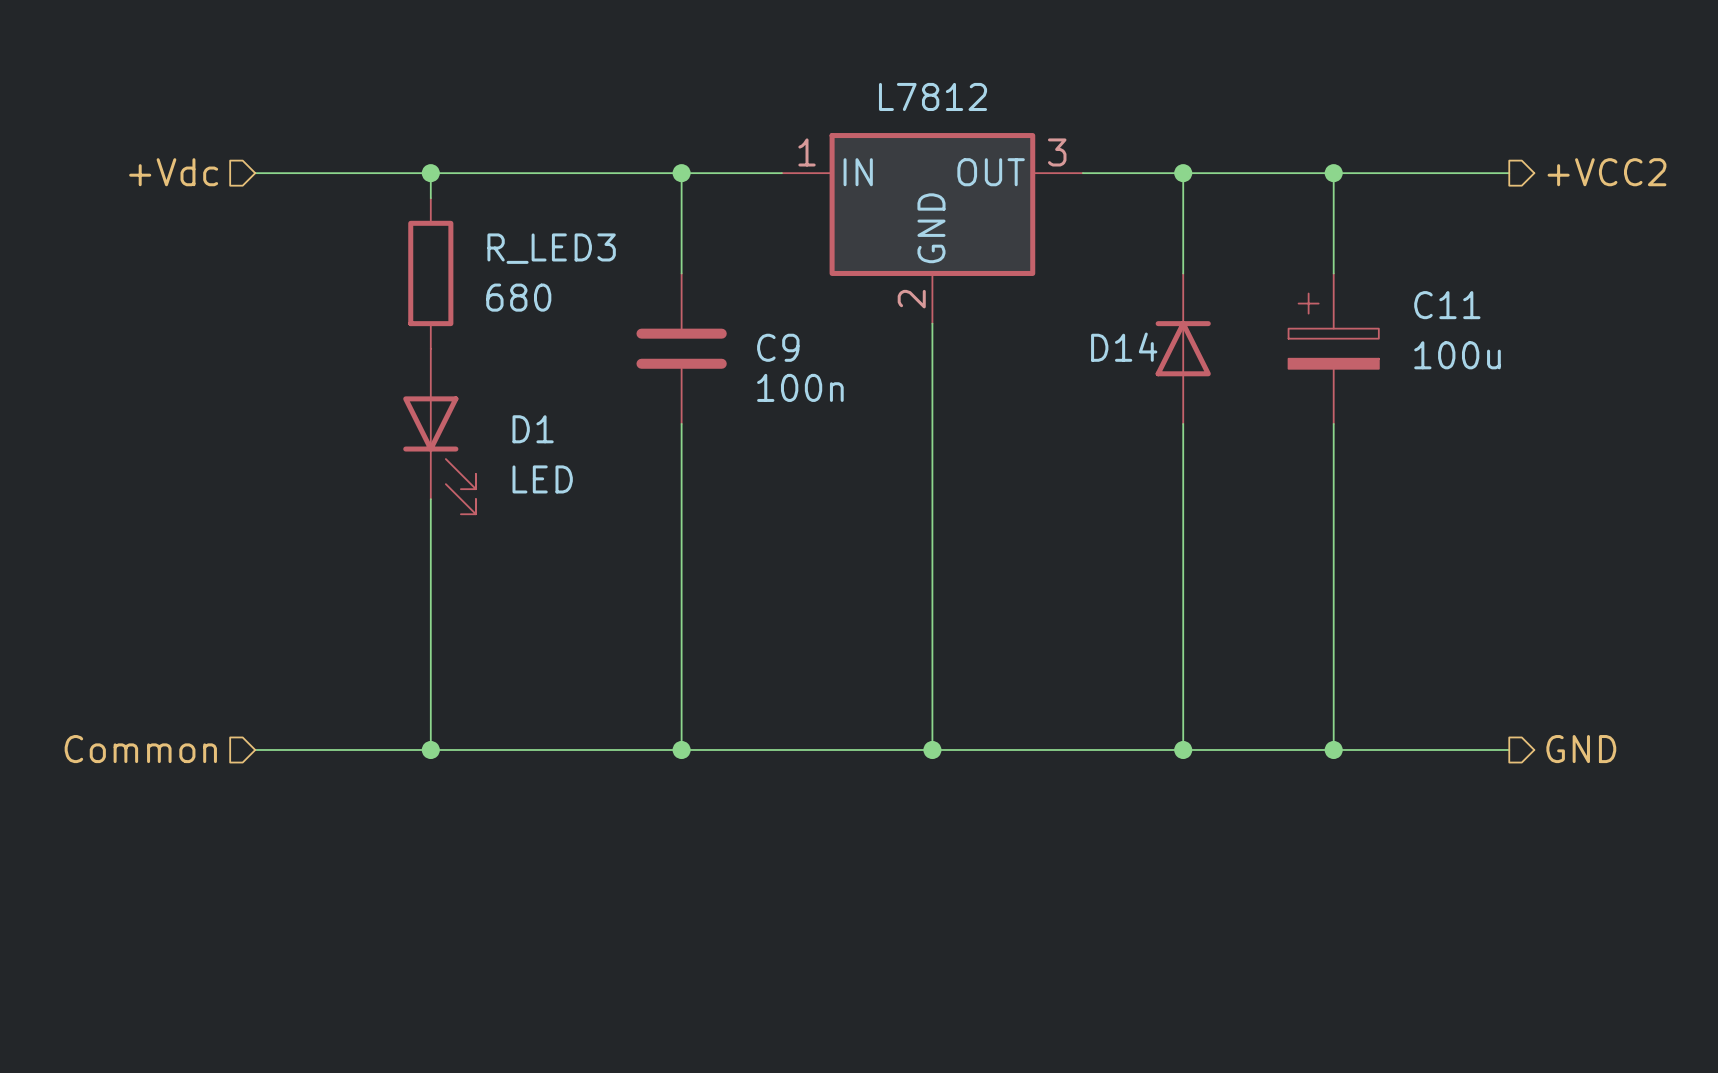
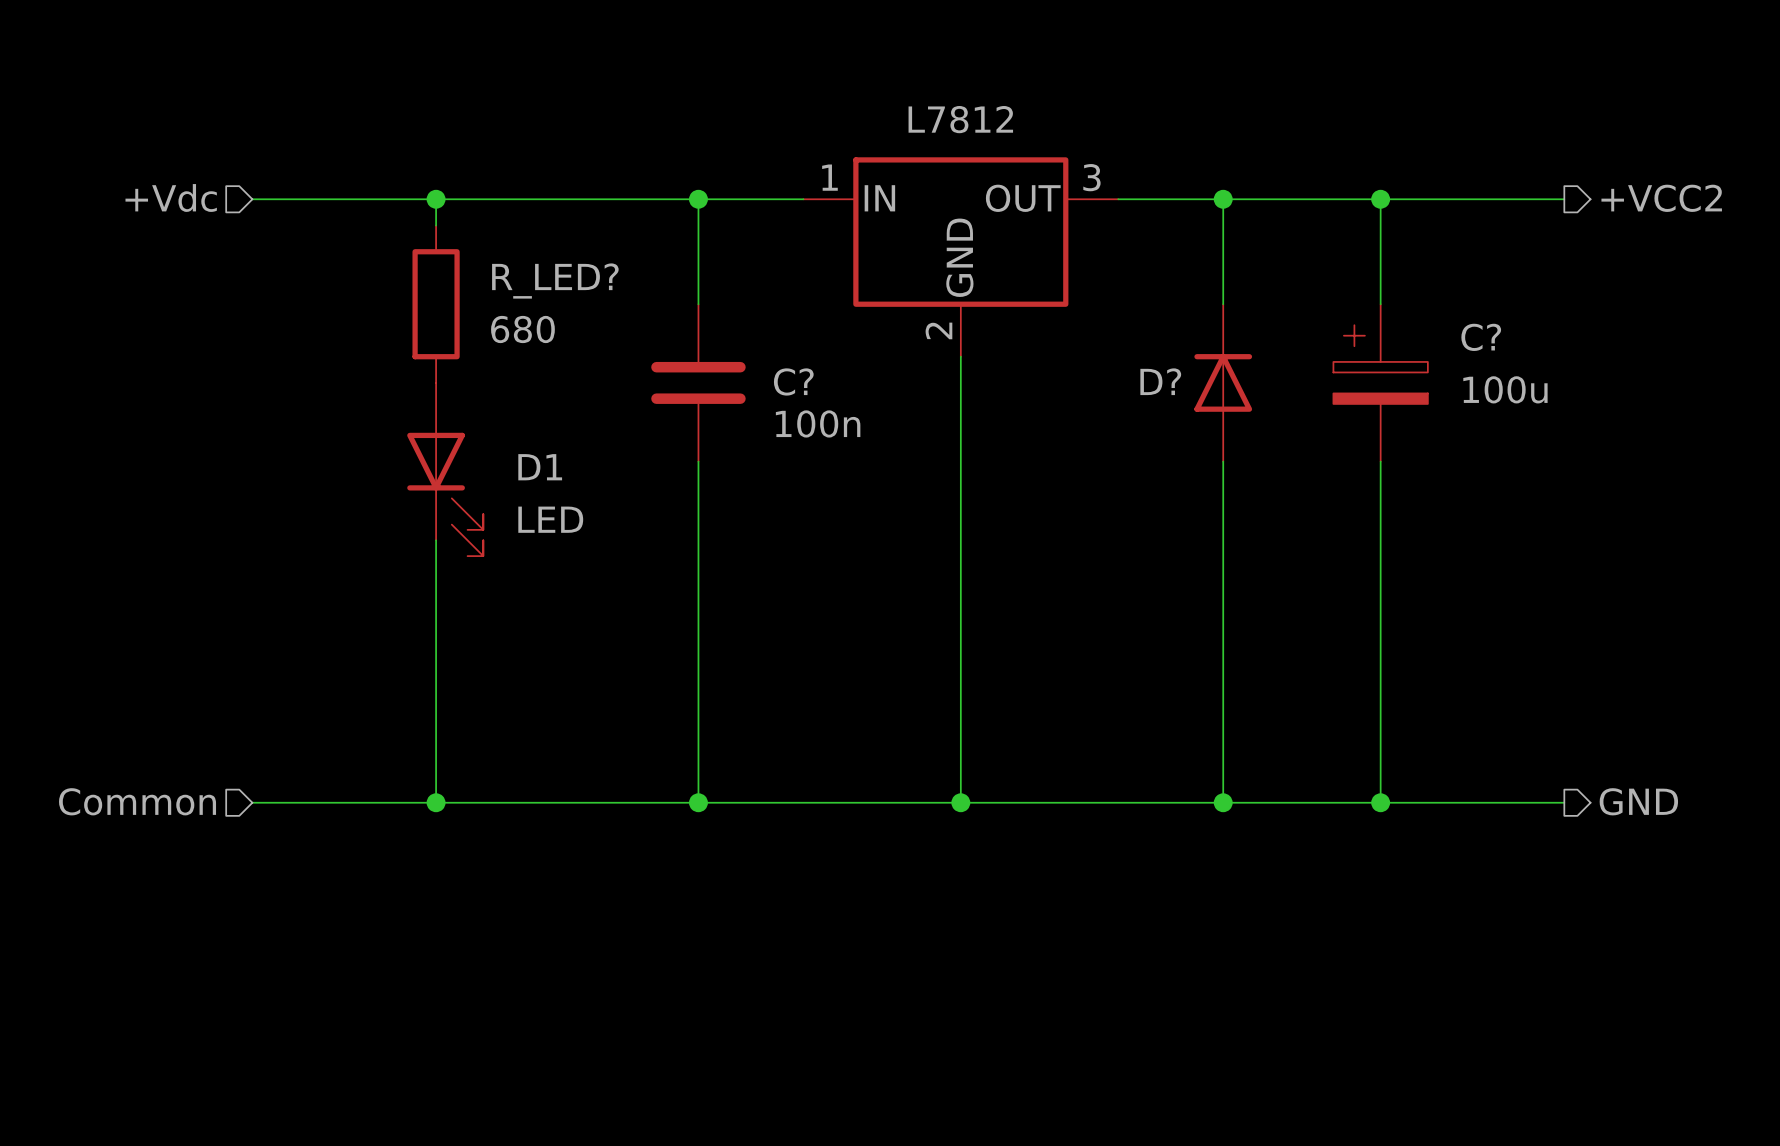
R_LED3 name: R_LED3 (551, 248) -> R_LED? (555, 281)
C11 name: C11 (1447, 305) -> C? (1481, 337)
C9 name: C9 (778, 347) -> C? (793, 381)
D14 name: D14 (1124, 347) -> D? (1160, 381)

